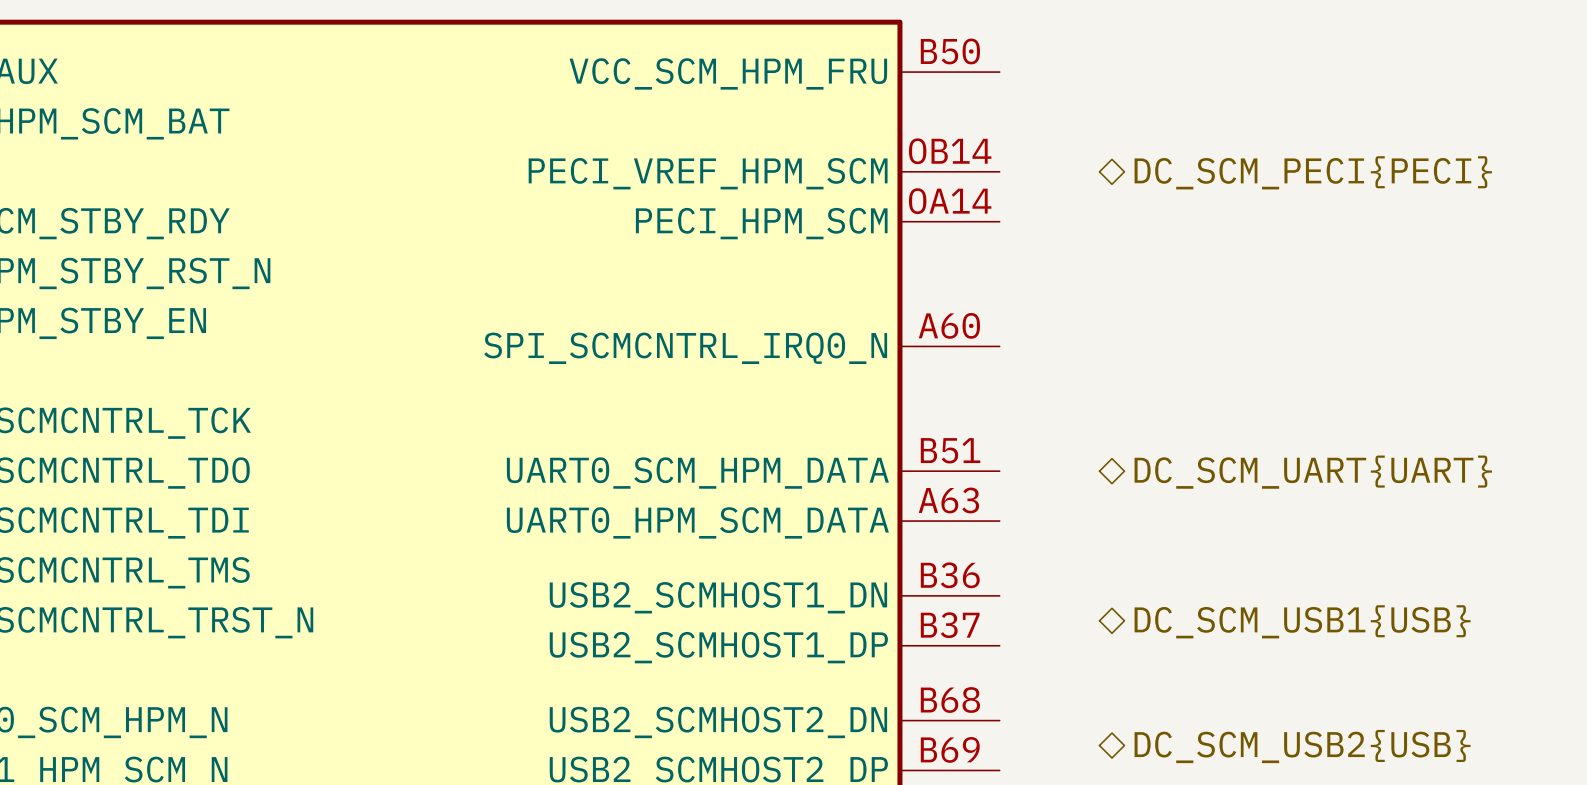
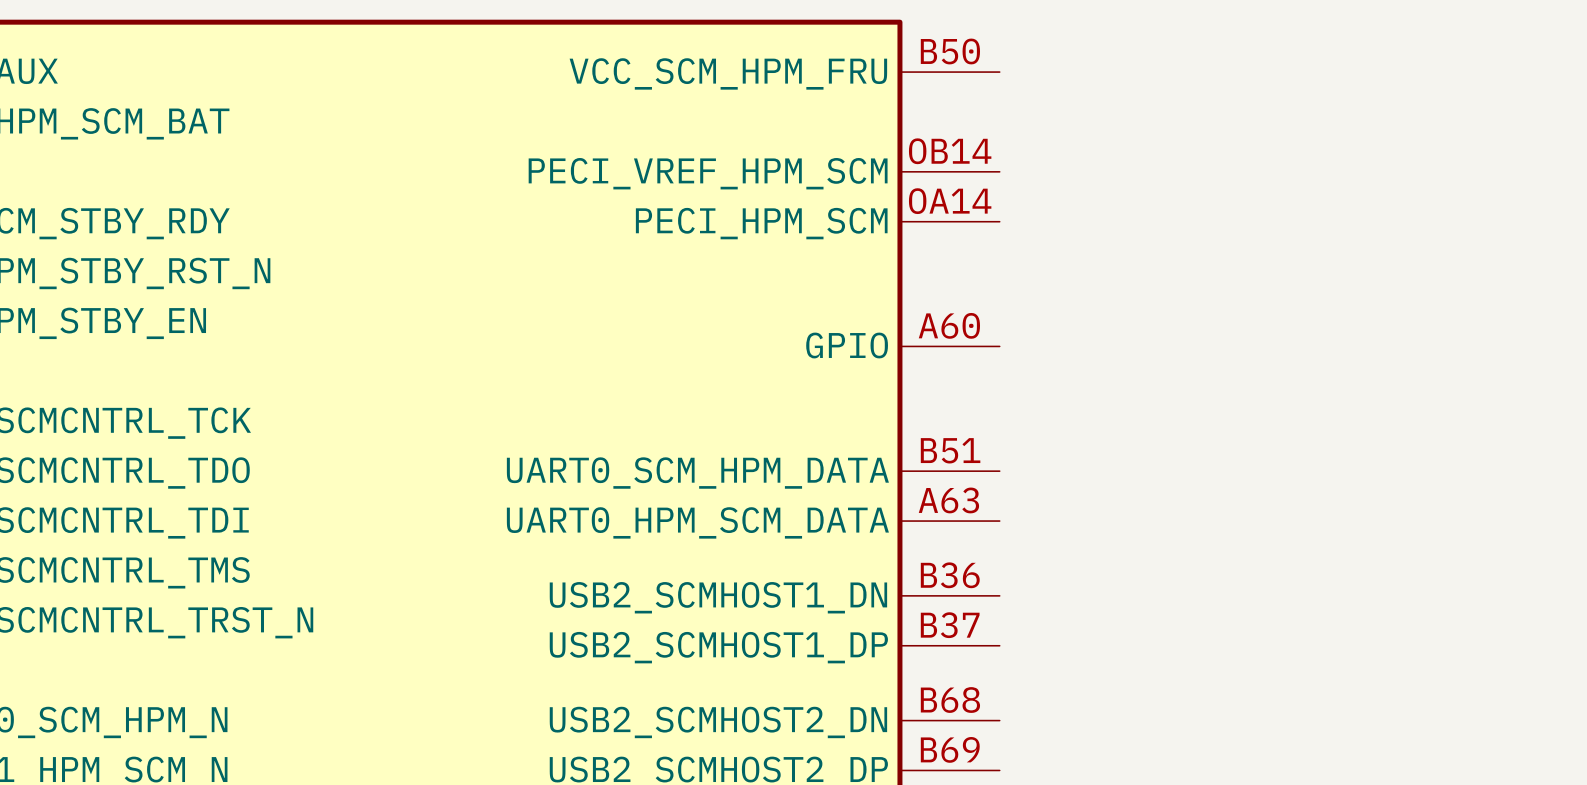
hierarchical label: DC_SCM_PECI{PECI} (1313, 172) -> none
part pin name: SPI_SCMCNTRL_IRQ0_N (685, 348) -> GPIO (847, 345)
hierarchical label: DC_SCM_UART{UART} (1313, 472) -> none
hierarchical label: DC_SCM_USB1{USB} (1302, 621) -> none
hierarchical label: DC_SCM_USB2{USB} (1302, 746) -> none

